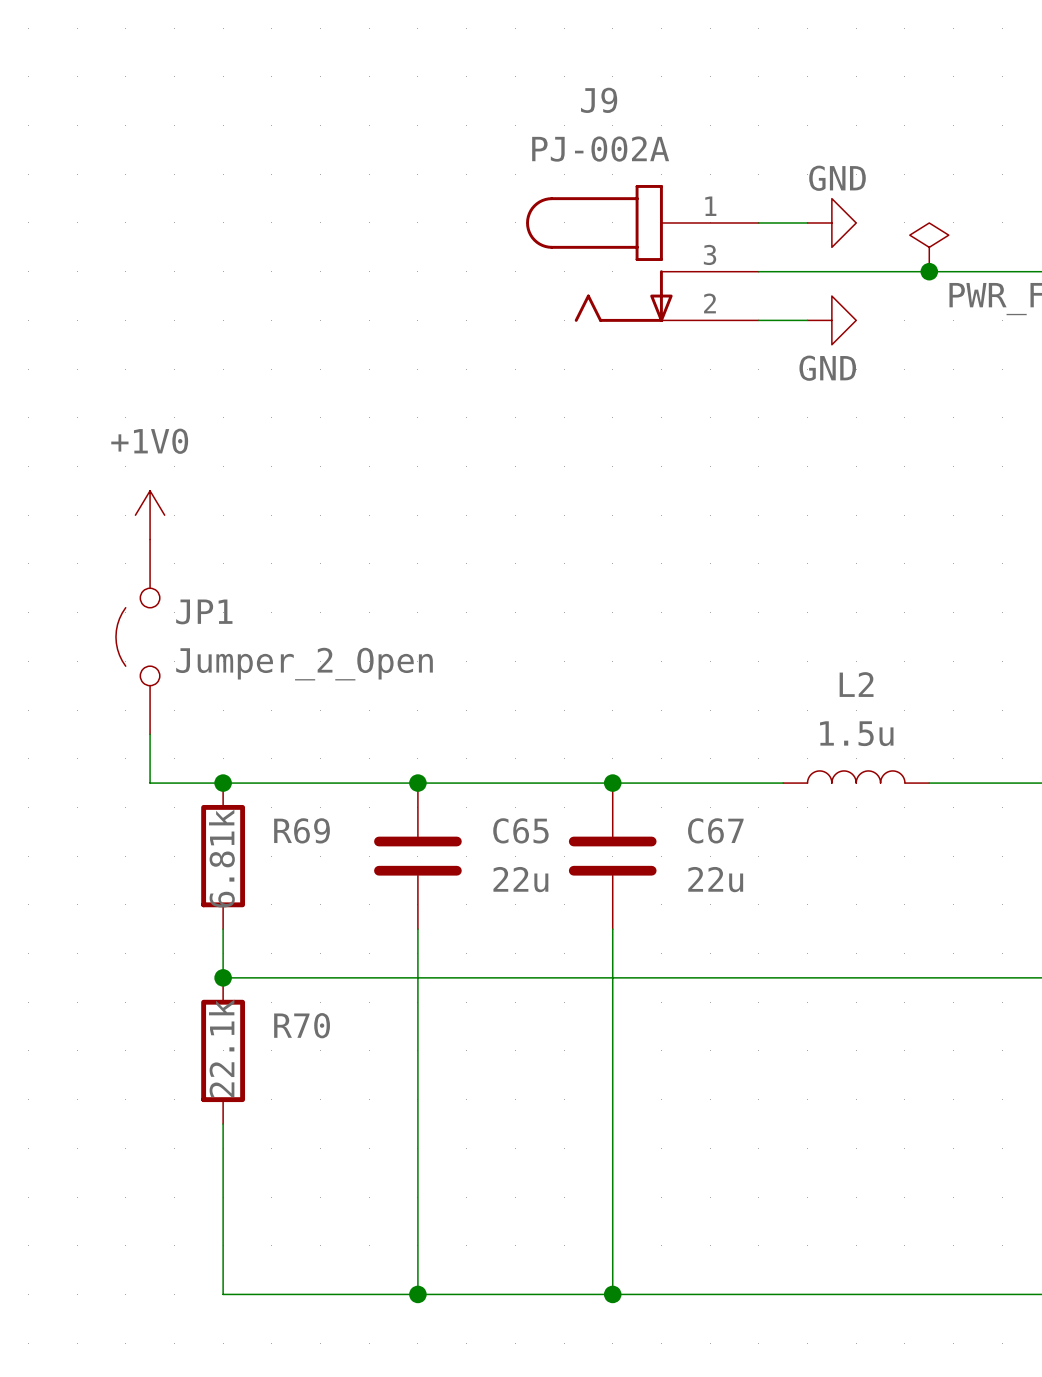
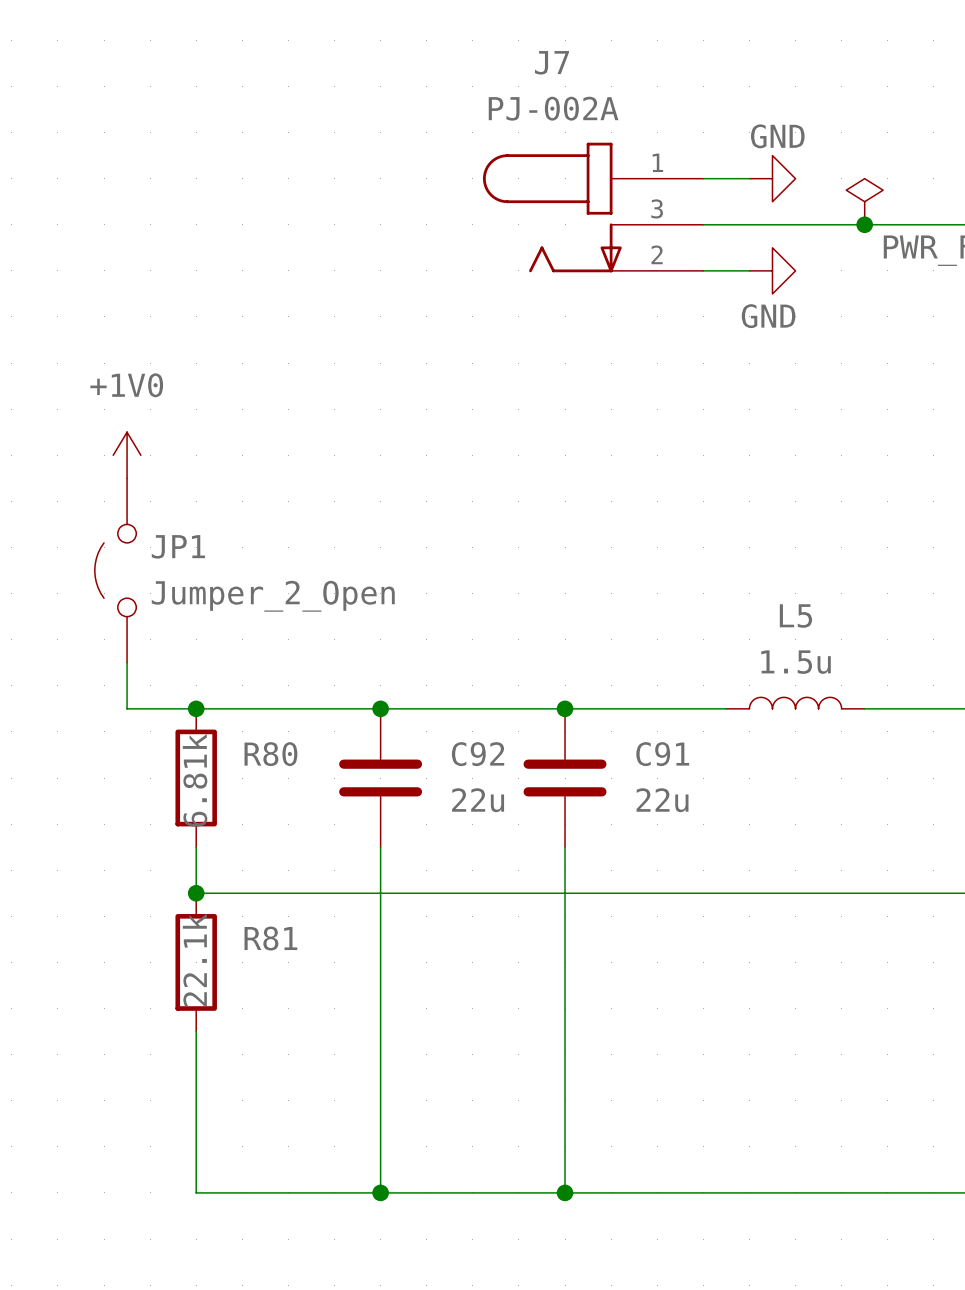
J9 name: J9 (599, 100) -> J7 (552, 62)
L2 name: L2 (856, 684) -> L5 (795, 616)
R69 name: R69 (302, 830) -> R80 (270, 754)
C65 name: C65 (520, 830) -> C92 (478, 754)
C67 name: C67 (715, 830) -> C91 (662, 754)
R70 name: R70 (302, 1025) -> R81 (270, 938)

